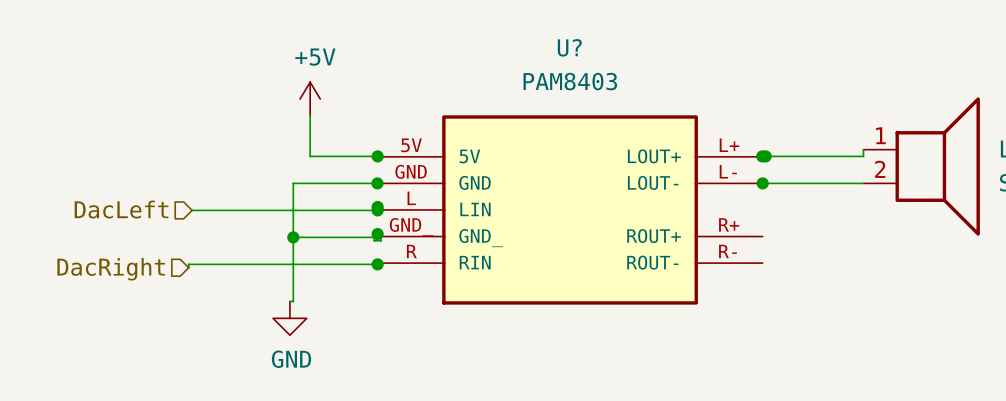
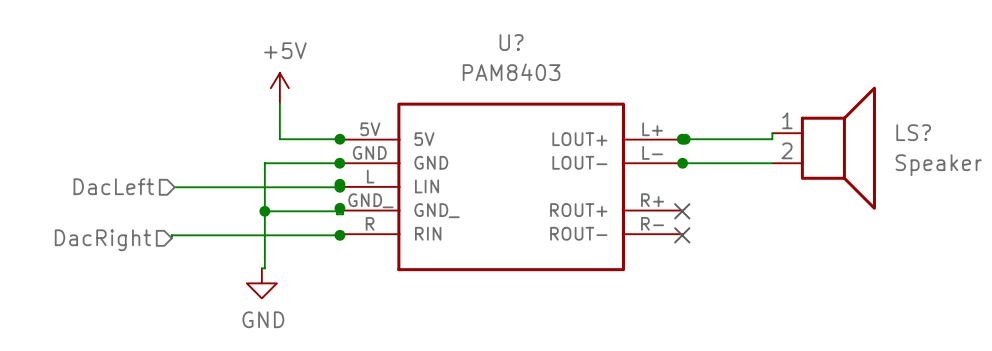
no-connect mark: none -> (682, 211)
no-connect mark: none -> (682, 235)

